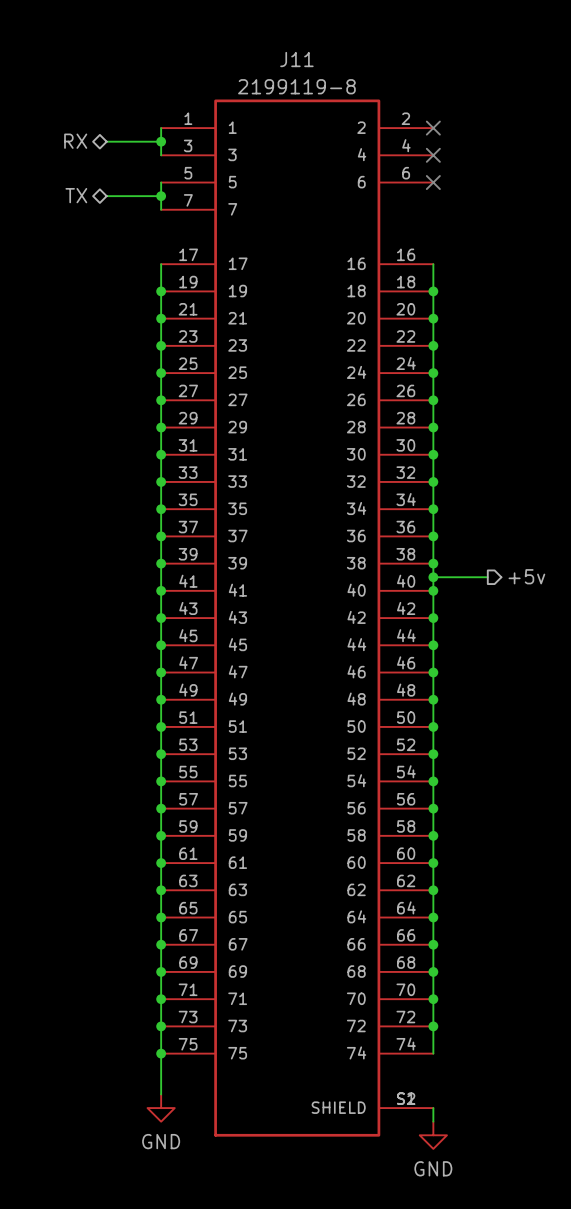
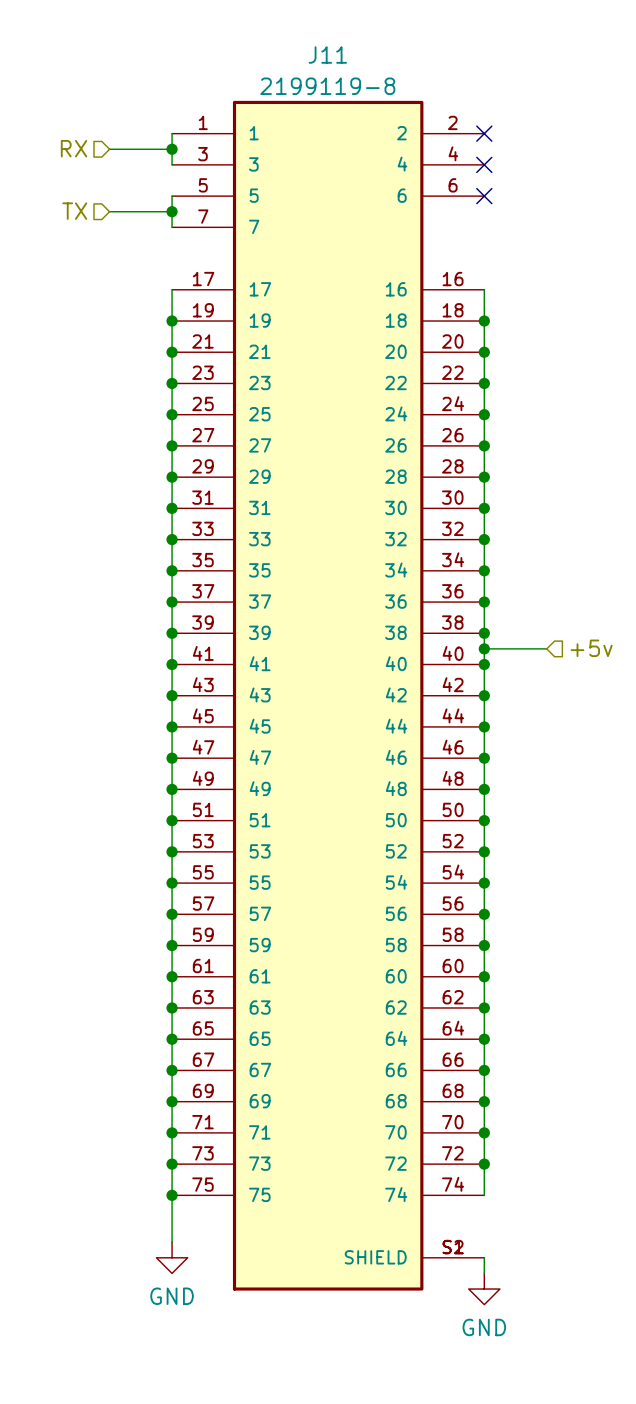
hierarchical label shape: bidirectional (75, 141) -> input (74, 148)
hierarchical label shape: bidirectional (76, 195) -> input (74, 211)
hierarchical label shape: output (526, 576) -> input (591, 648)

